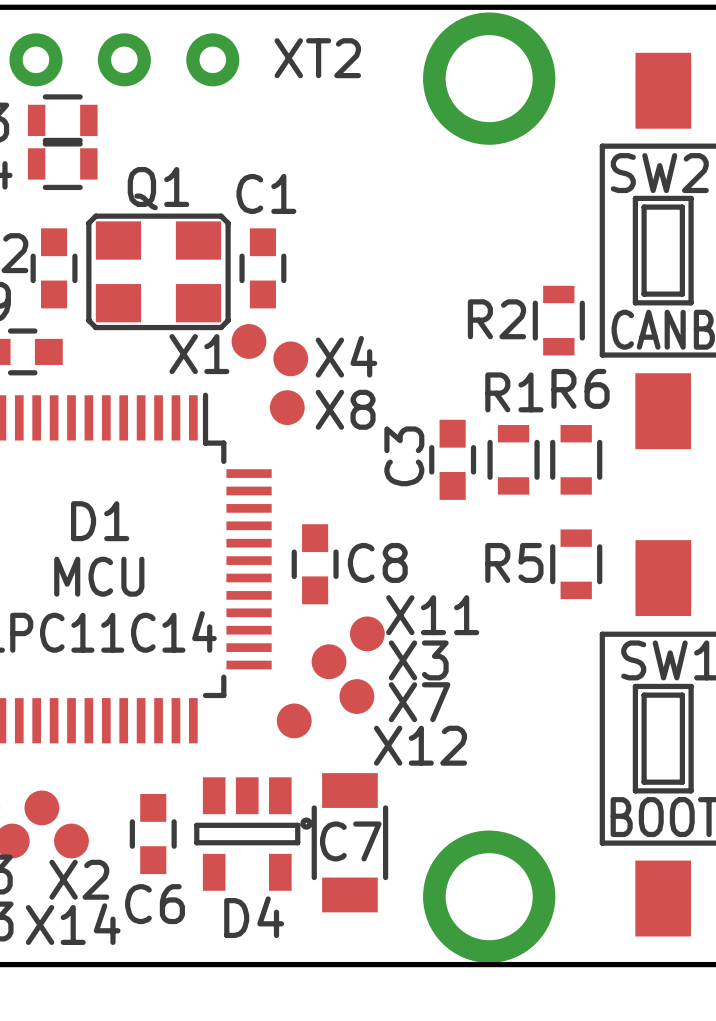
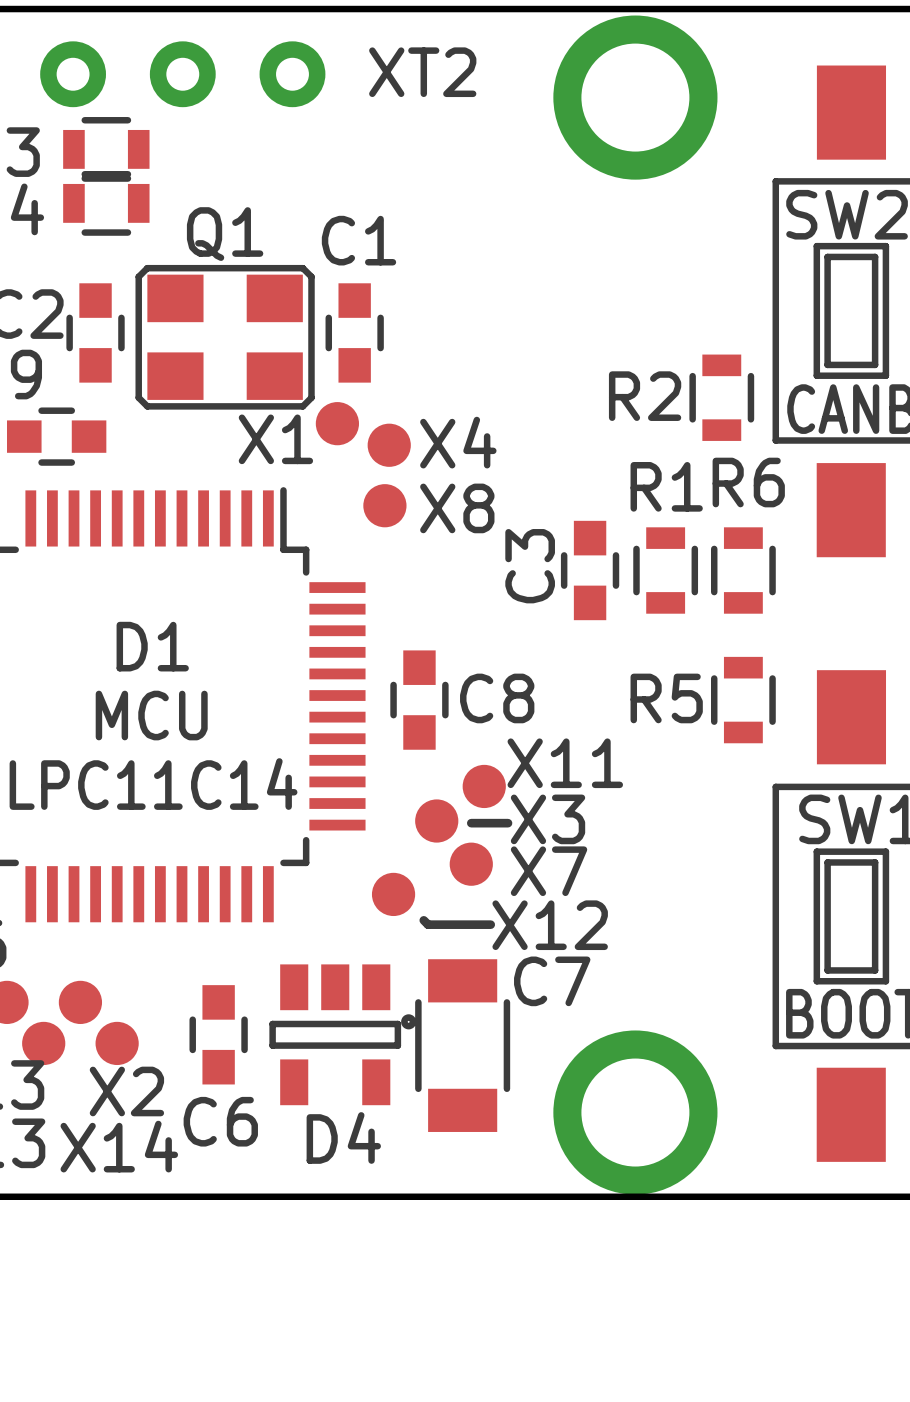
line: none -> (471, 823) (508, 823)
line: none -> (423, 920) (428, 924) (490, 924)
C7 name position: C7 (350, 841) -> C7 (552, 981)

